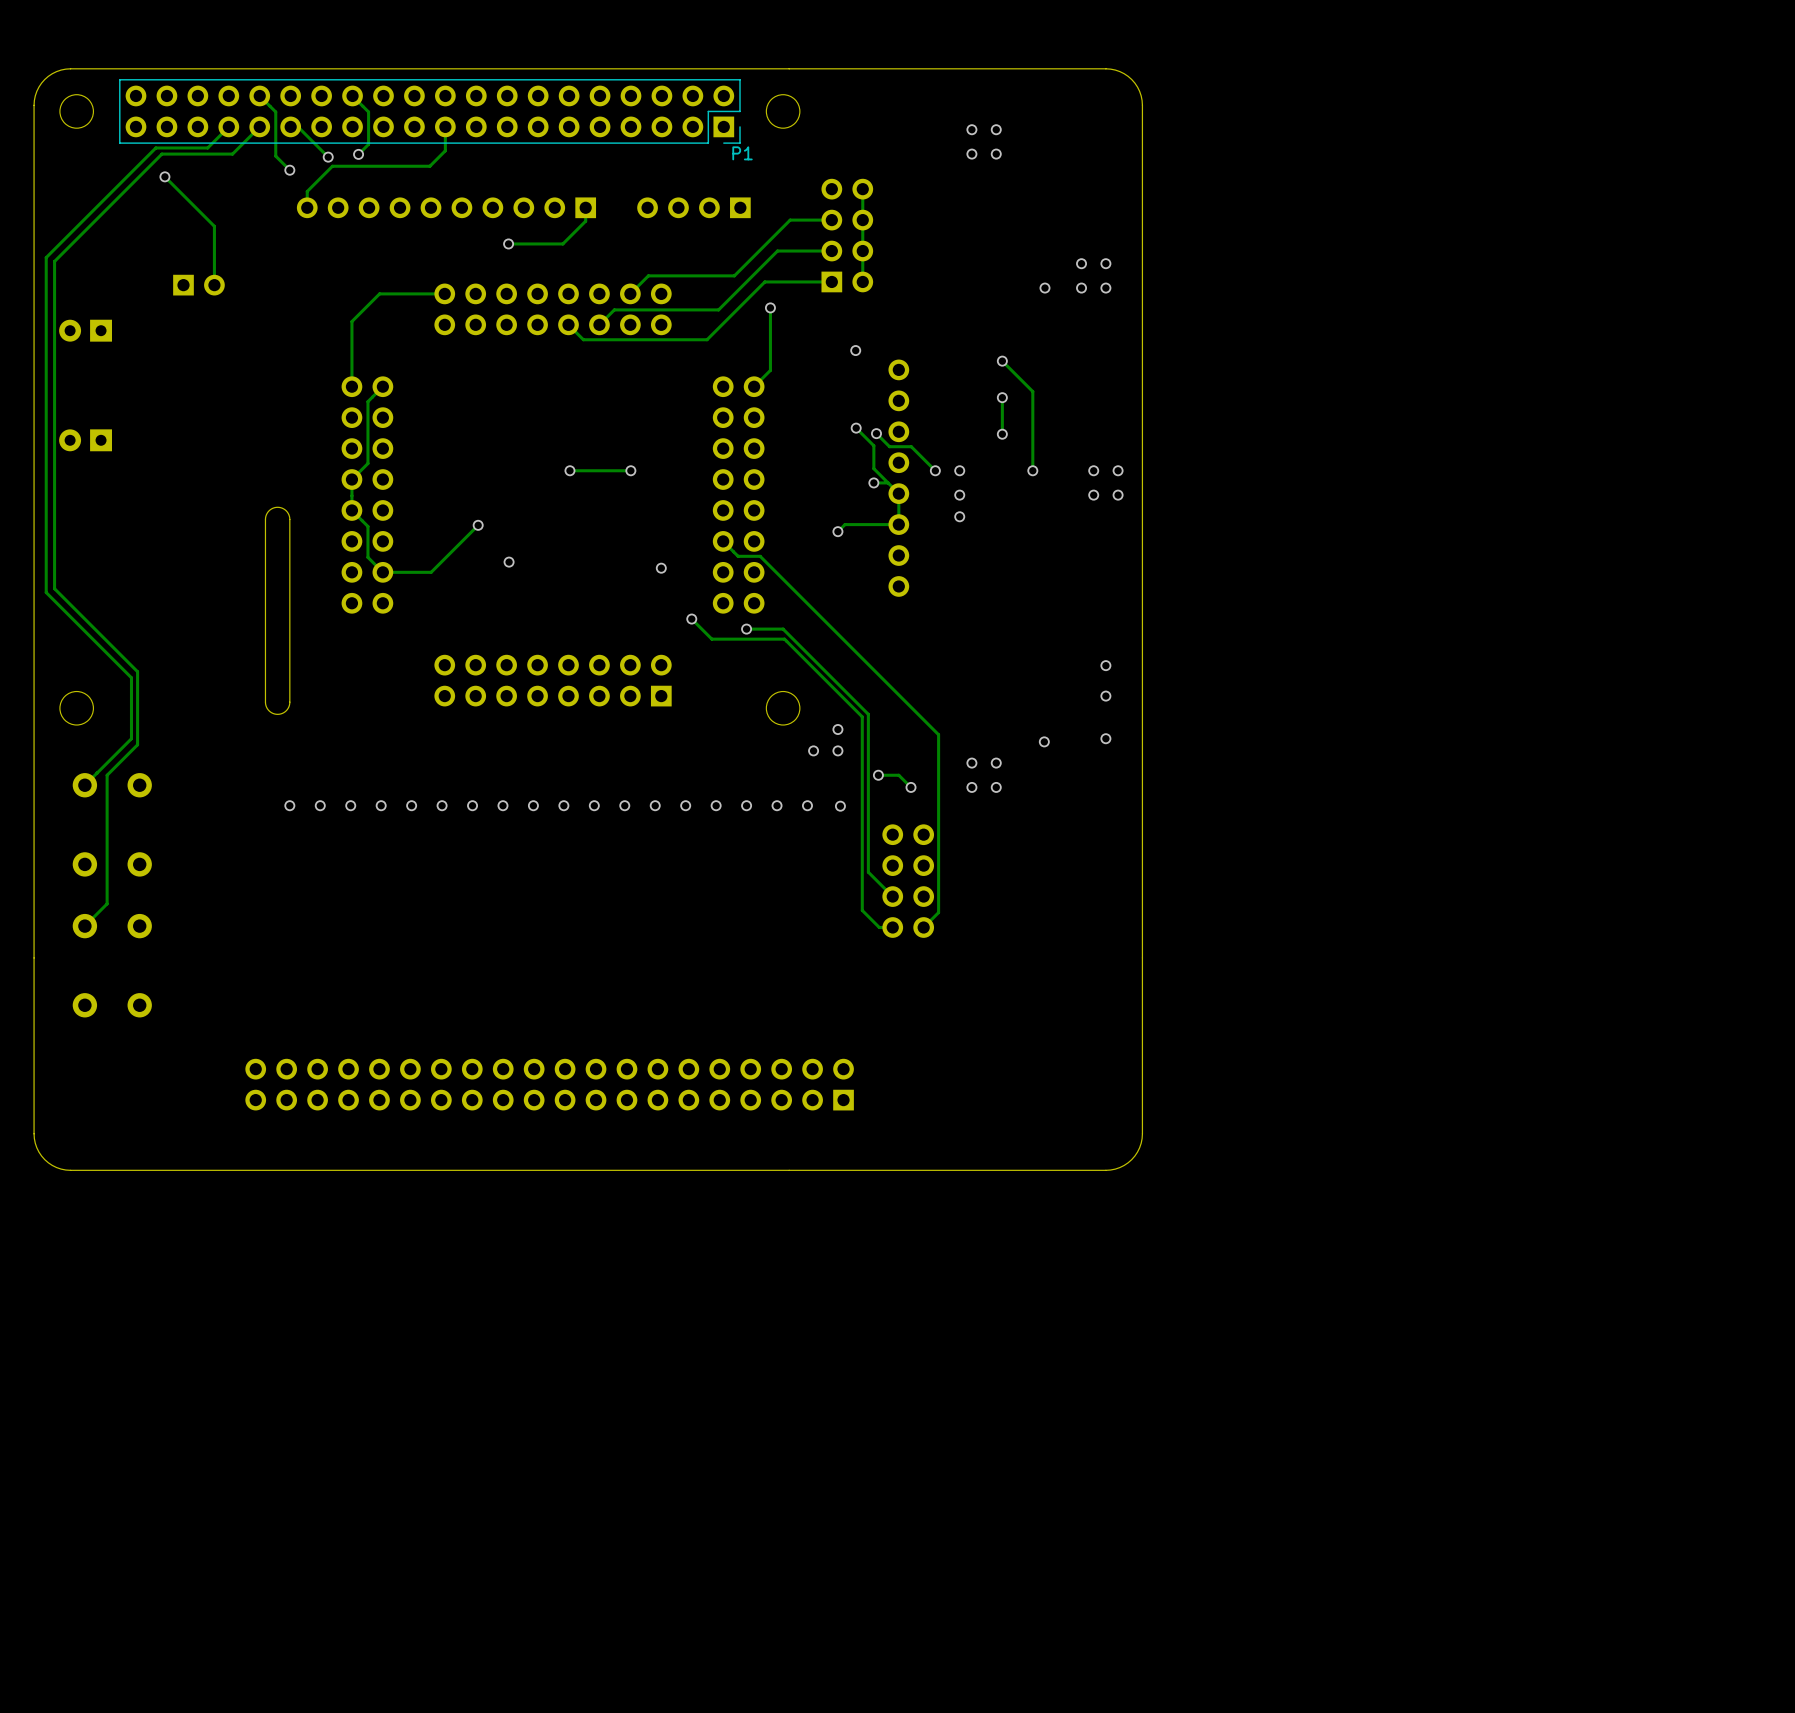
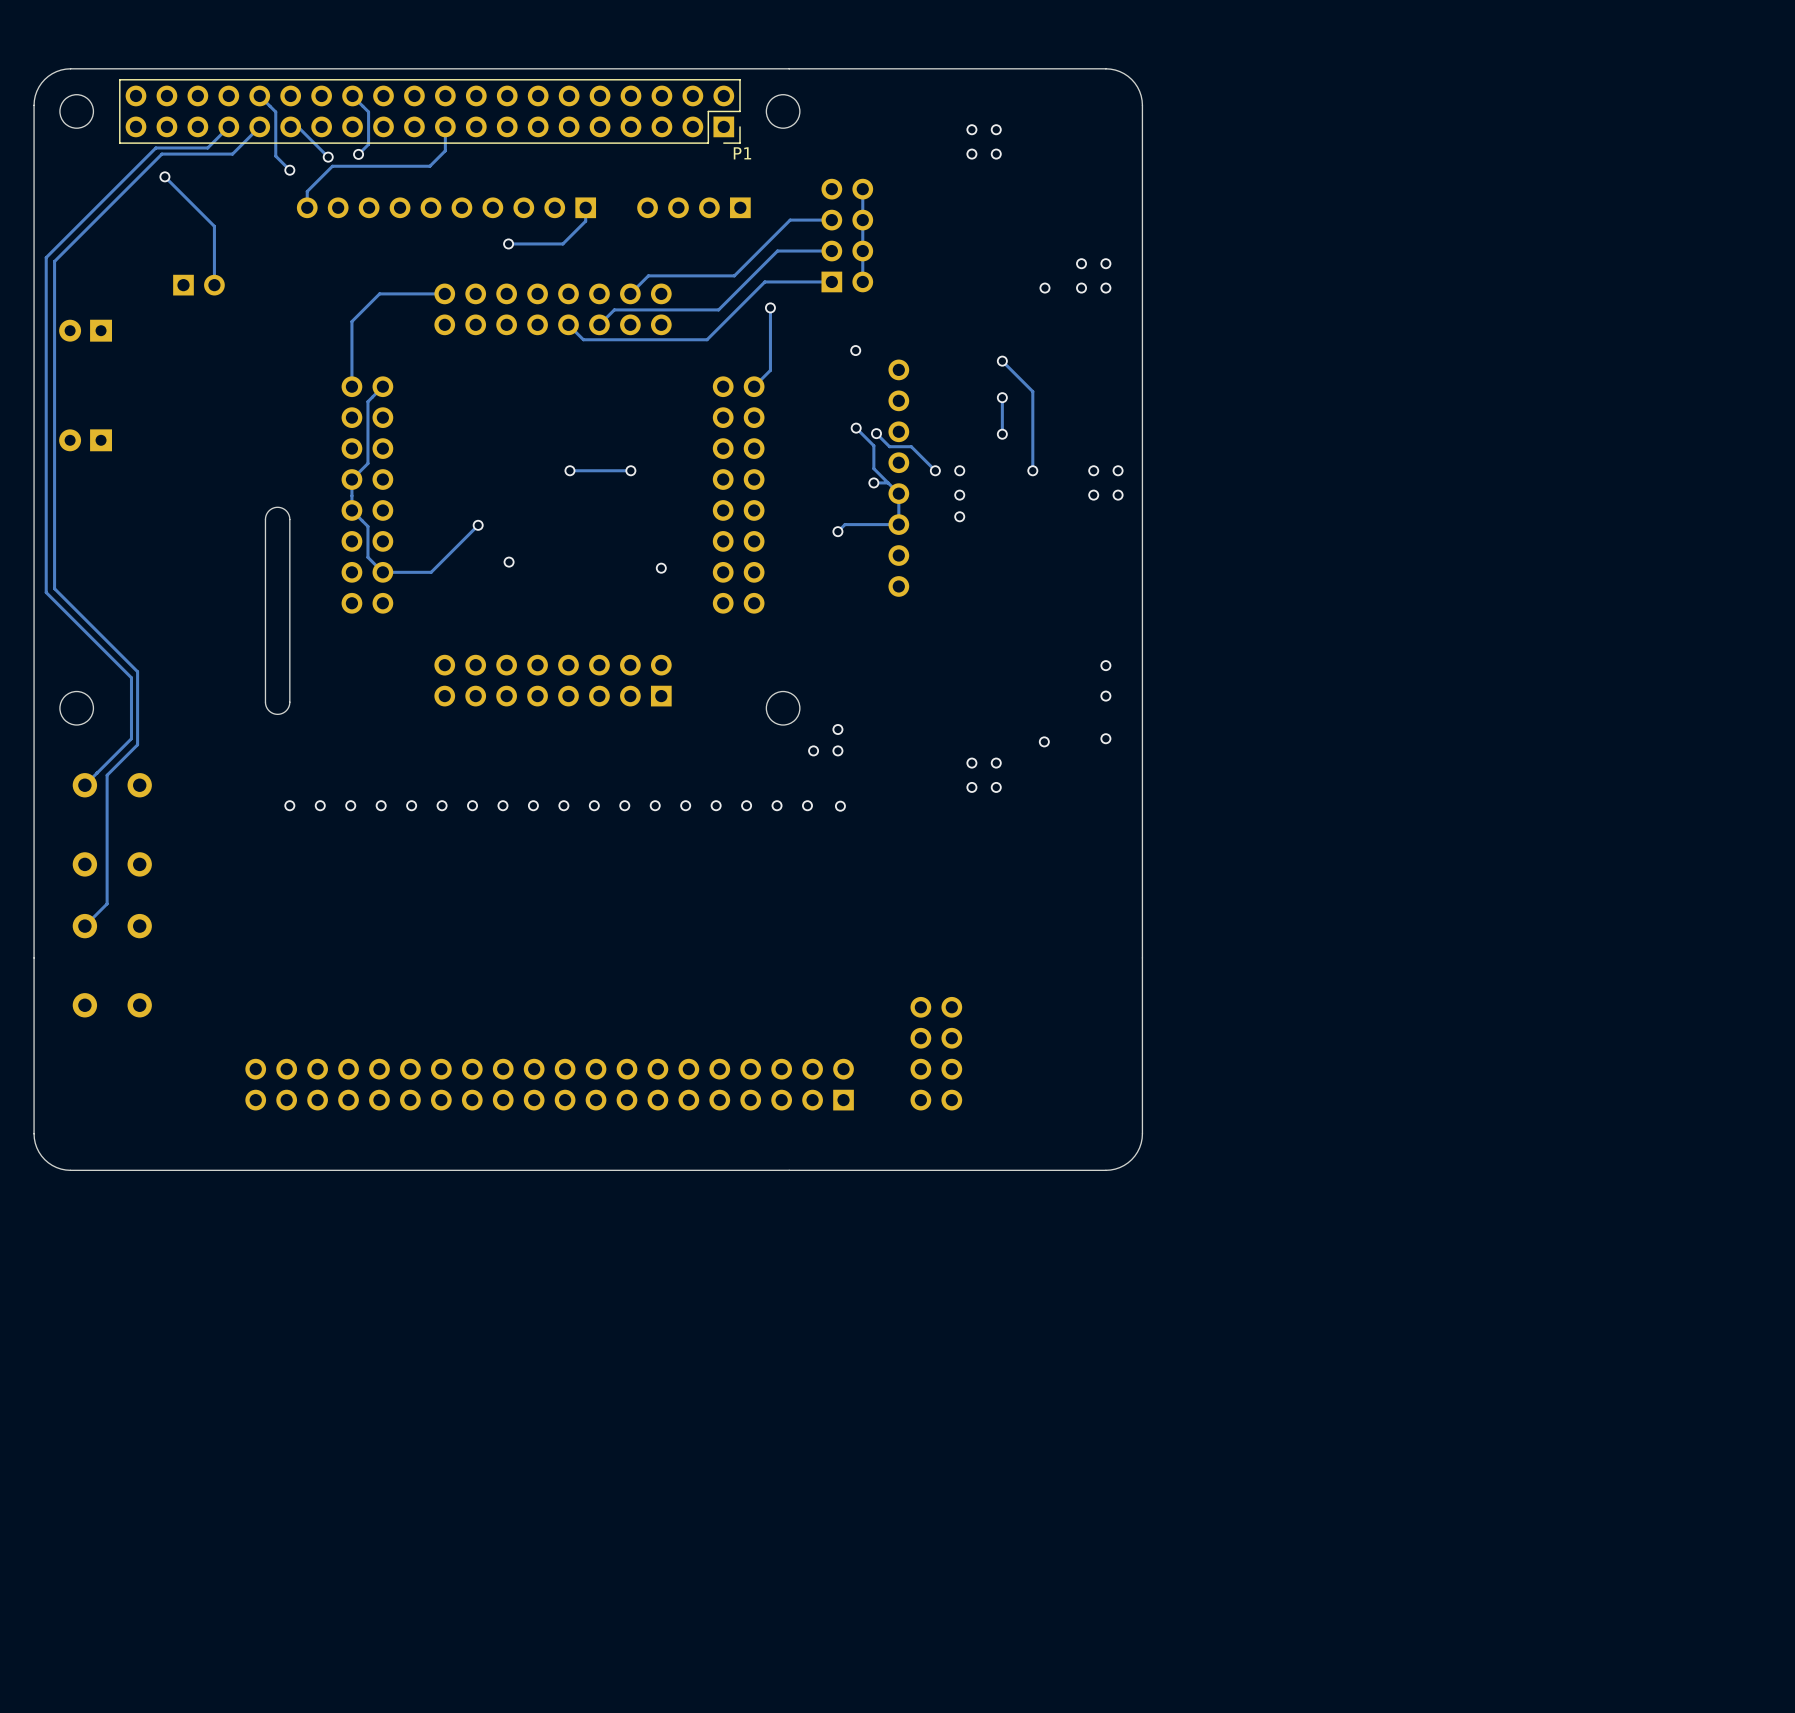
track: (723, 541) (738, 556) (760, 556) (938, 734) (938, 912) (923, 927) -> none
track: (691, 619) (711, 639) (784, 639) (862, 716) (862, 910) (879, 927) (892, 927) -> none
via: (691, 619) -> none
track: (746, 629) (783, 629) (868, 714) (868, 872) (892, 896) -> none
via: (746, 629) -> none
track: (878, 775) (898, 775) (911, 787) -> none
via: (878, 775) -> none
via: (911, 787) -> none
part position: (908, 881) -> (936, 1053)

